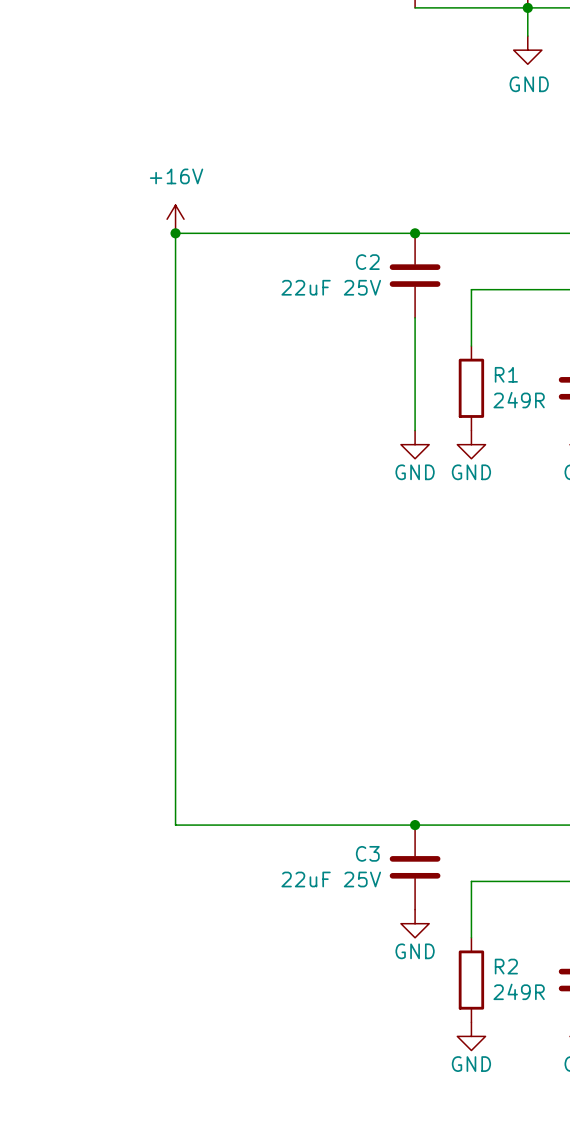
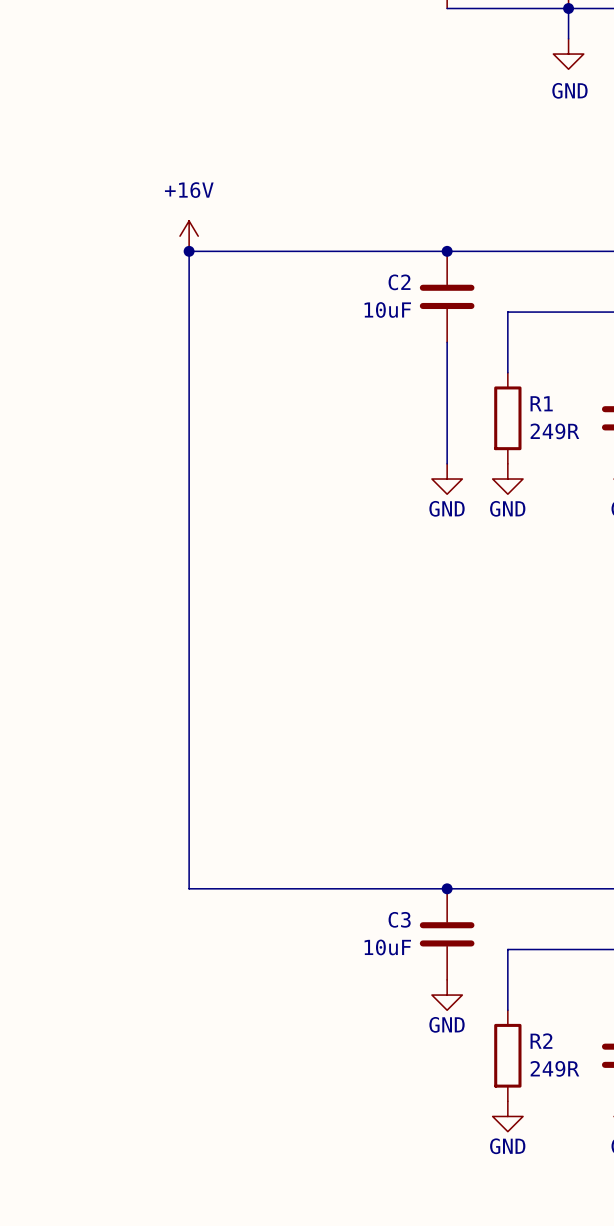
C2 value: 22uF 25V (331, 287) -> 10uF (387, 309)
C3 value: 22uF 25V (331, 879) -> 10uF (387, 947)

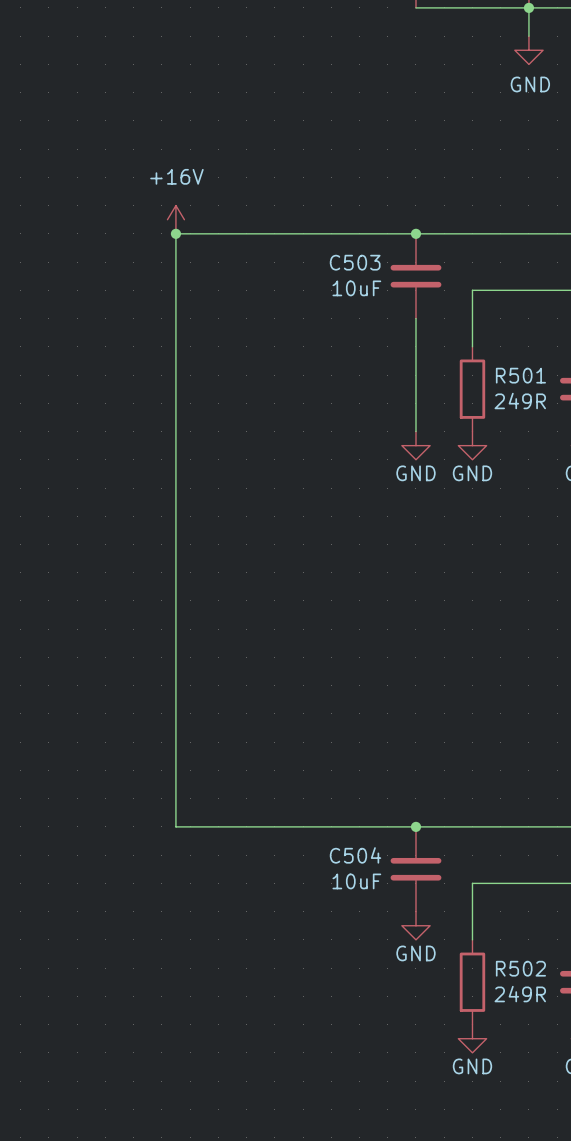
C2 name: C2 (399, 282) -> C503 (355, 262)
R1 name: R1 (541, 403) -> R501 (520, 375)
C3 name: C3 (399, 919) -> C504 (355, 855)
R2 name: R2 (541, 1041) -> R502 (520, 968)

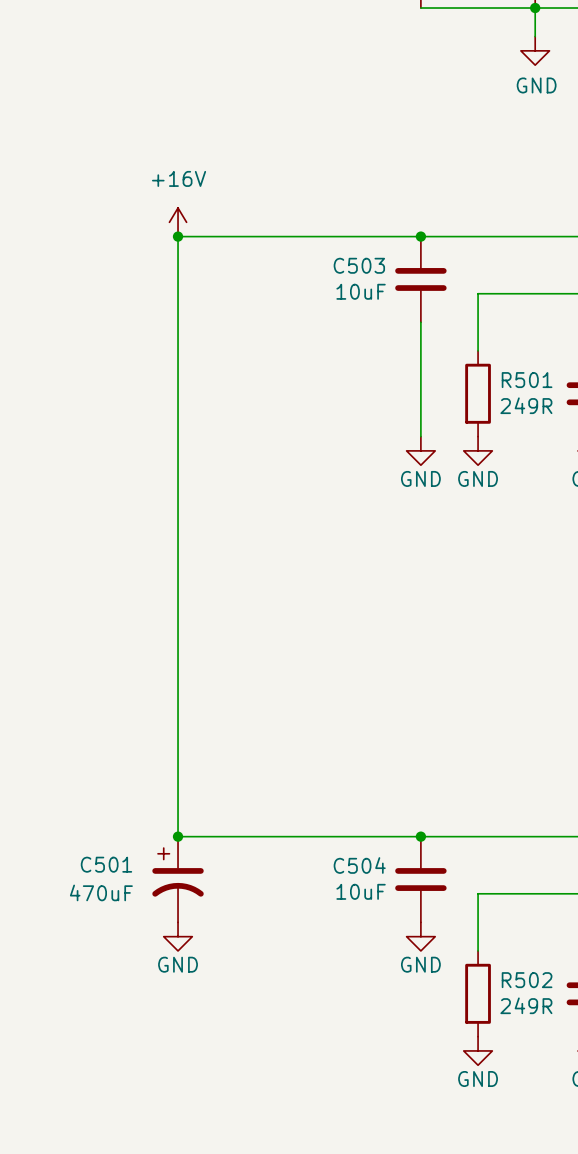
junction: none -> (178, 836)
C501: none -> 470uF (178, 879)
power symbol: none -> GND (178, 936)

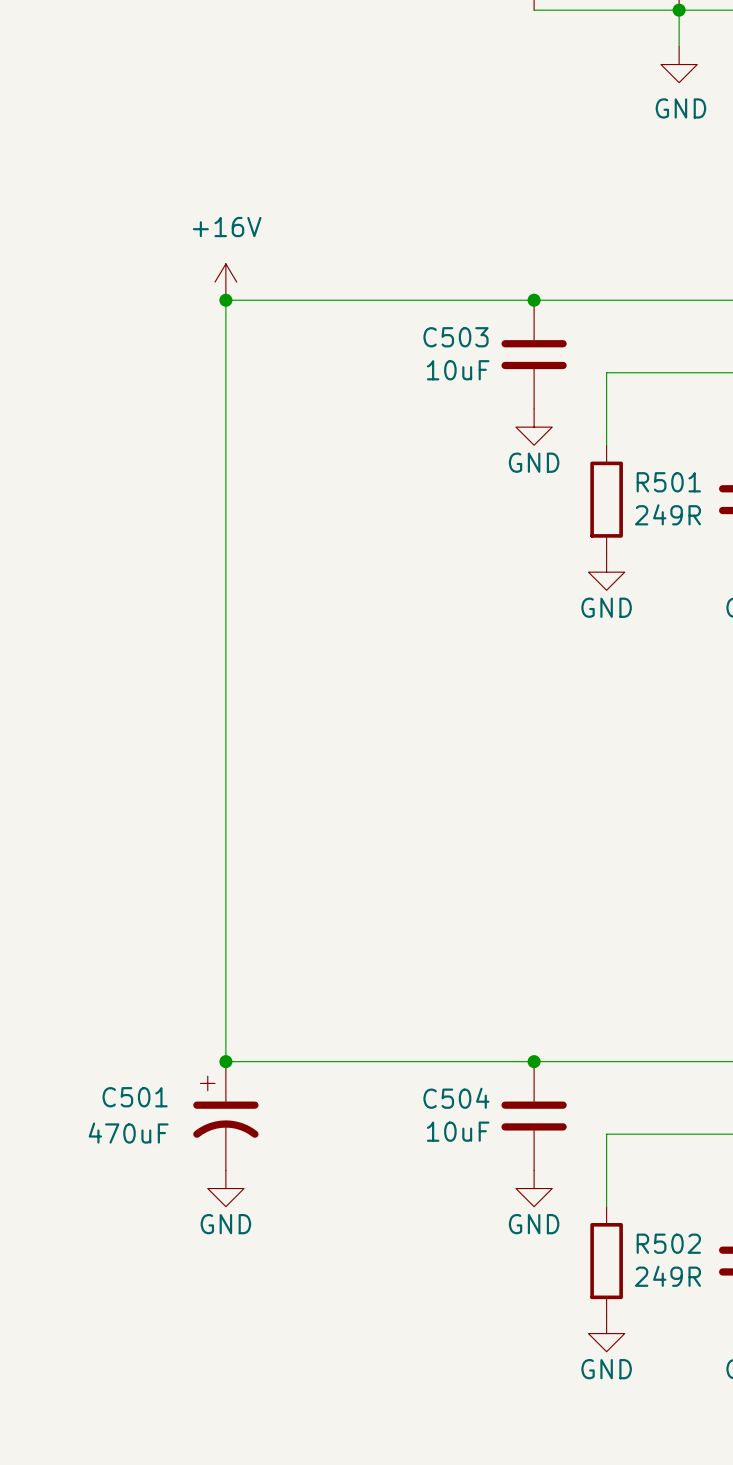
wire: (420, 322) (420, 436) -> none
power symbol position: GND (420, 450) -> GND (534, 427)

